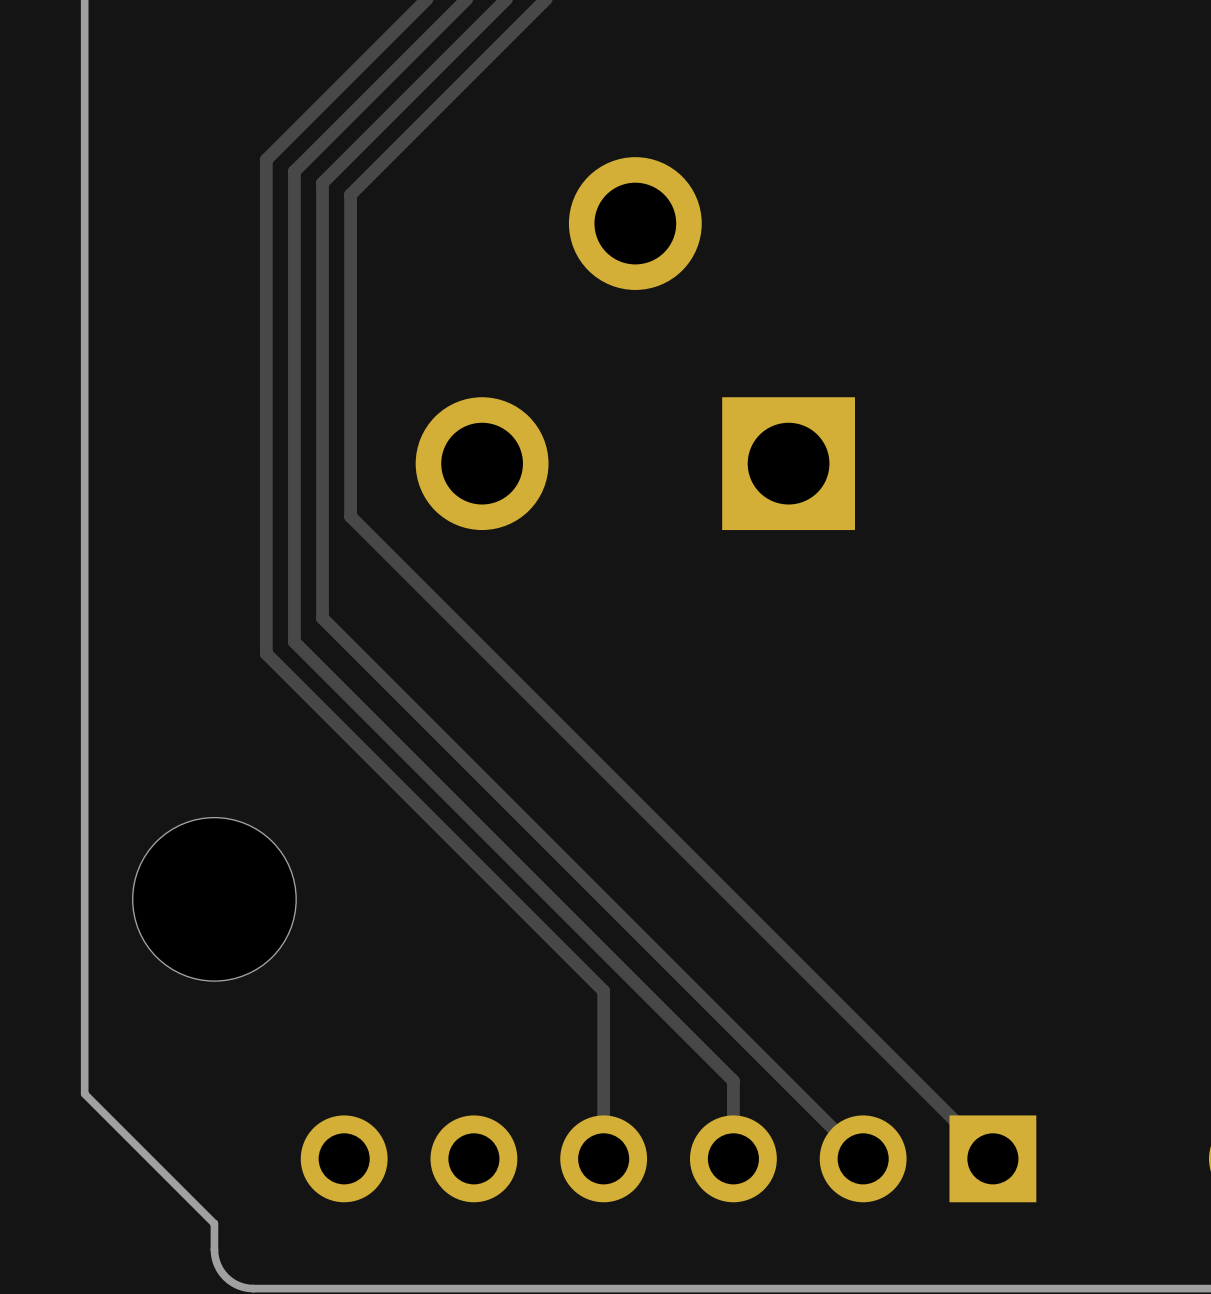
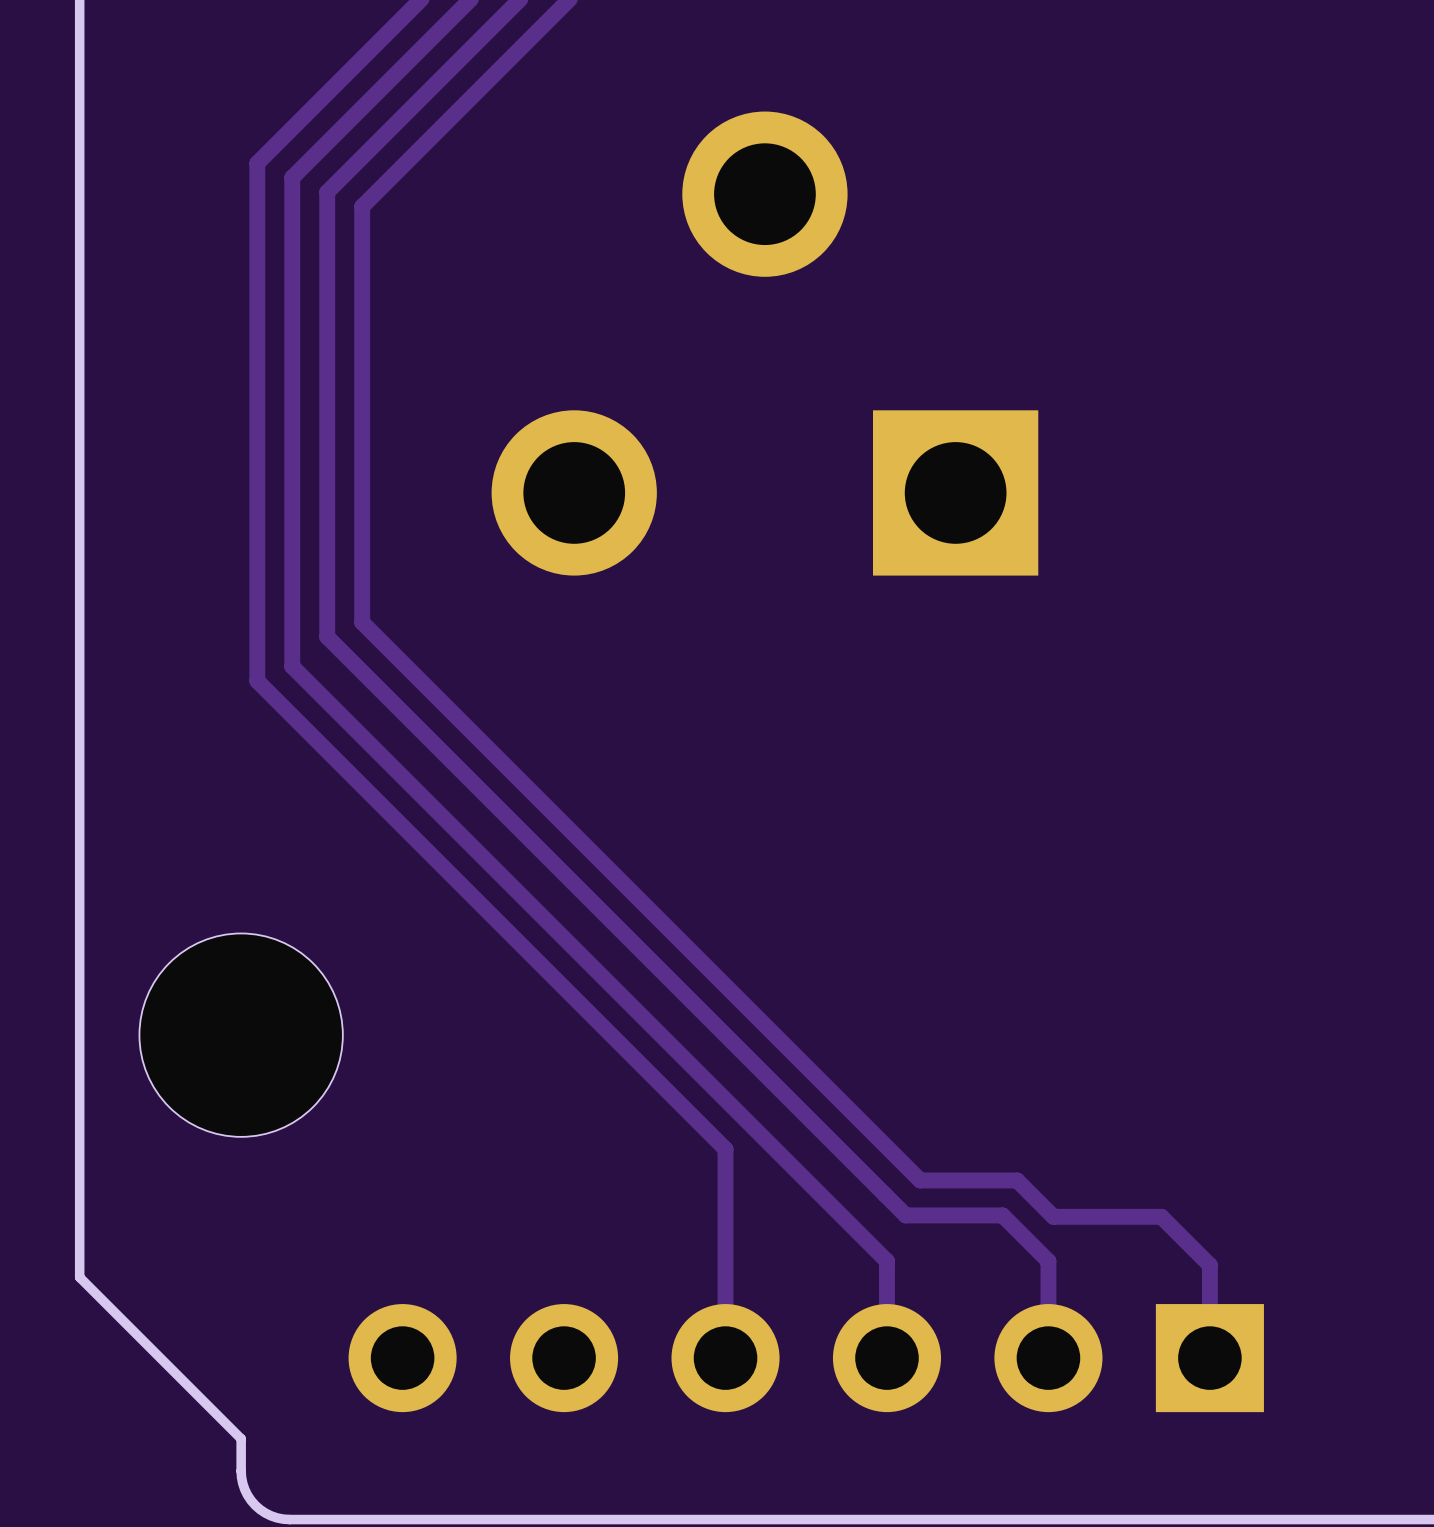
track: (266, 159) (266, 653) -> (305, 114) (257, 163) (257, 680) (305, 729)
track: (294, 171) (294, 642) -> (340, 129) (292, 177) (292, 666) (340, 714)
track: (322, 183) (322, 618) -> (375, 143) (327, 192) (327, 636) (375, 685)
track: (350, 194) (350, 516) (992, 1158) -> (410, 158) (362, 206) (362, 622) (920, 1180) (1017, 1180) (1053, 1216) (1161, 1216) (1209, 1265) (1209, 1358)
track: (748, 1044) (863, 1158) -> (905, 1215) (1002, 1215) (1048, 1261) (1048, 1358)

